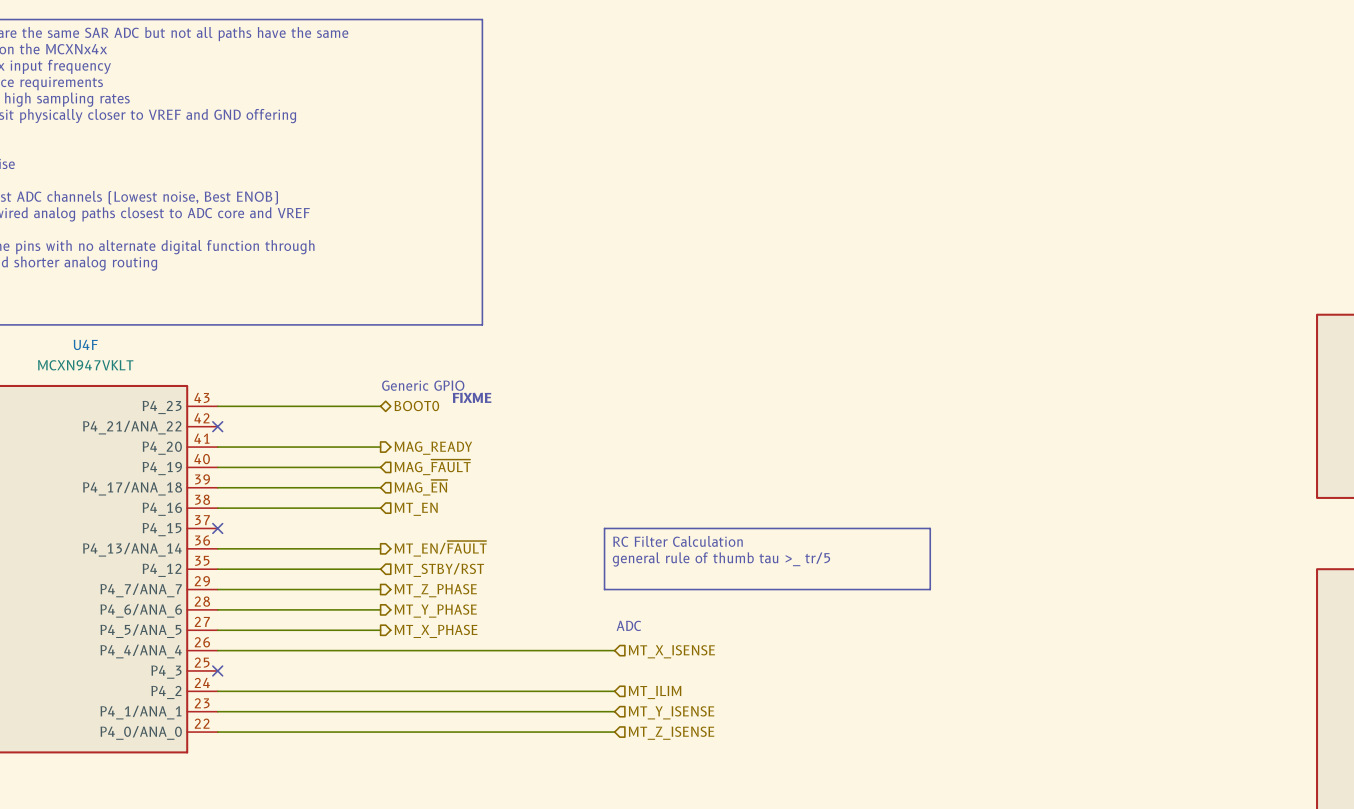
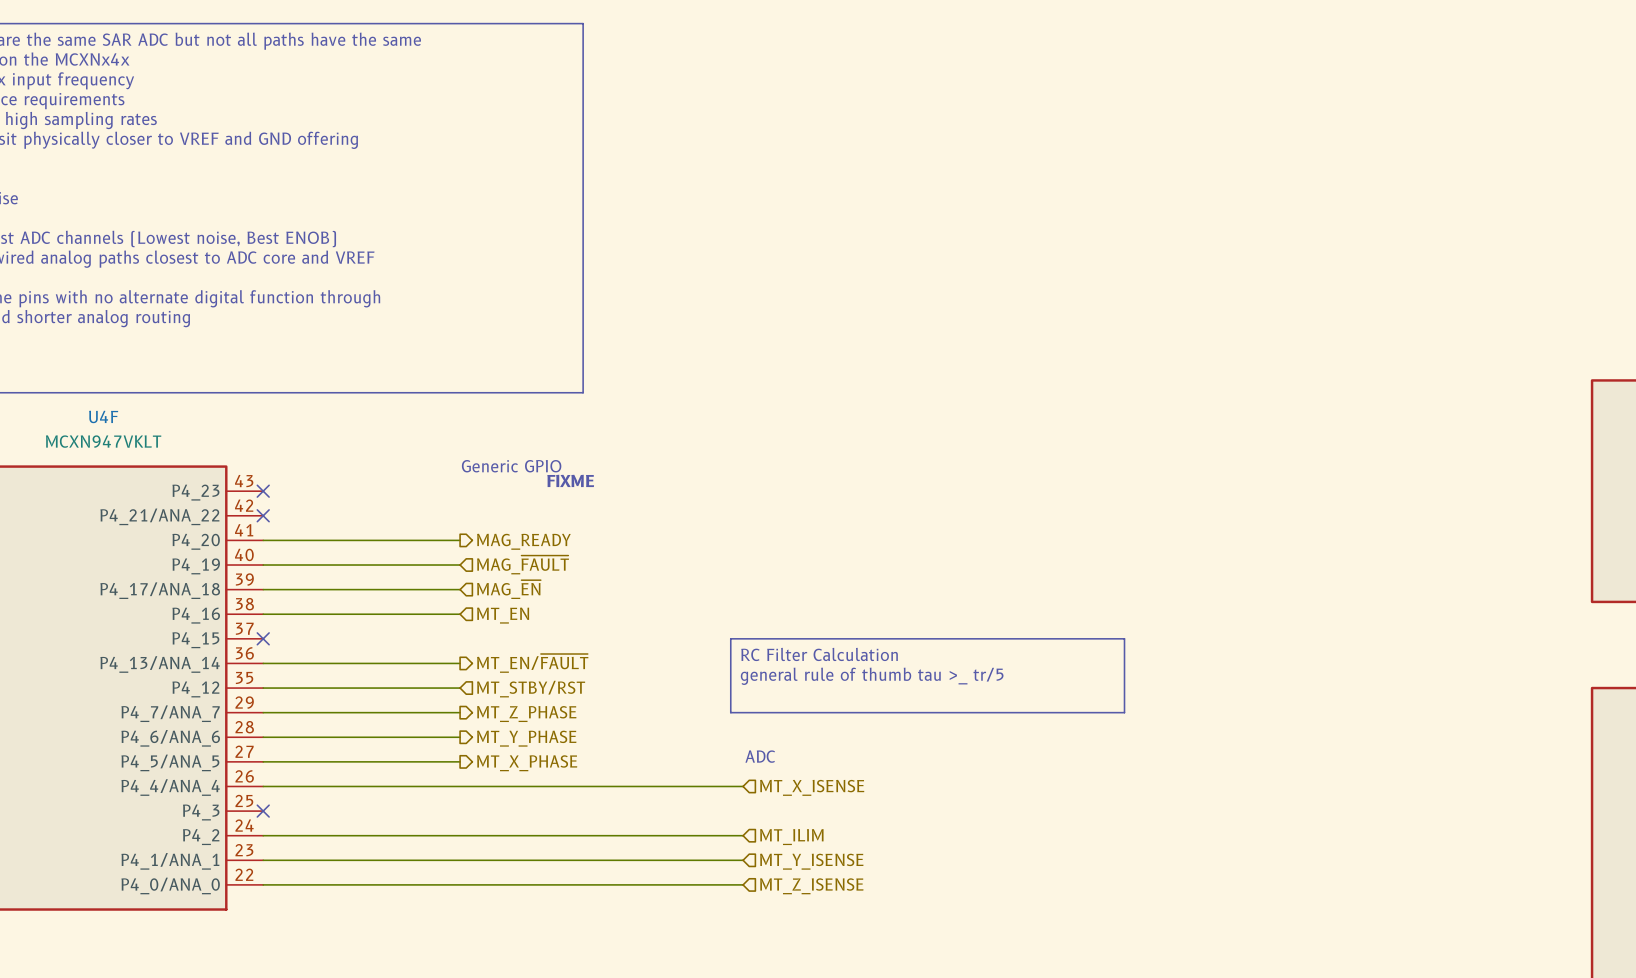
wire: (217, 406) (380, 406) -> none
no-connect mark: none -> (263, 491)
hierarchical label: BOOT0 (416, 406) -> none

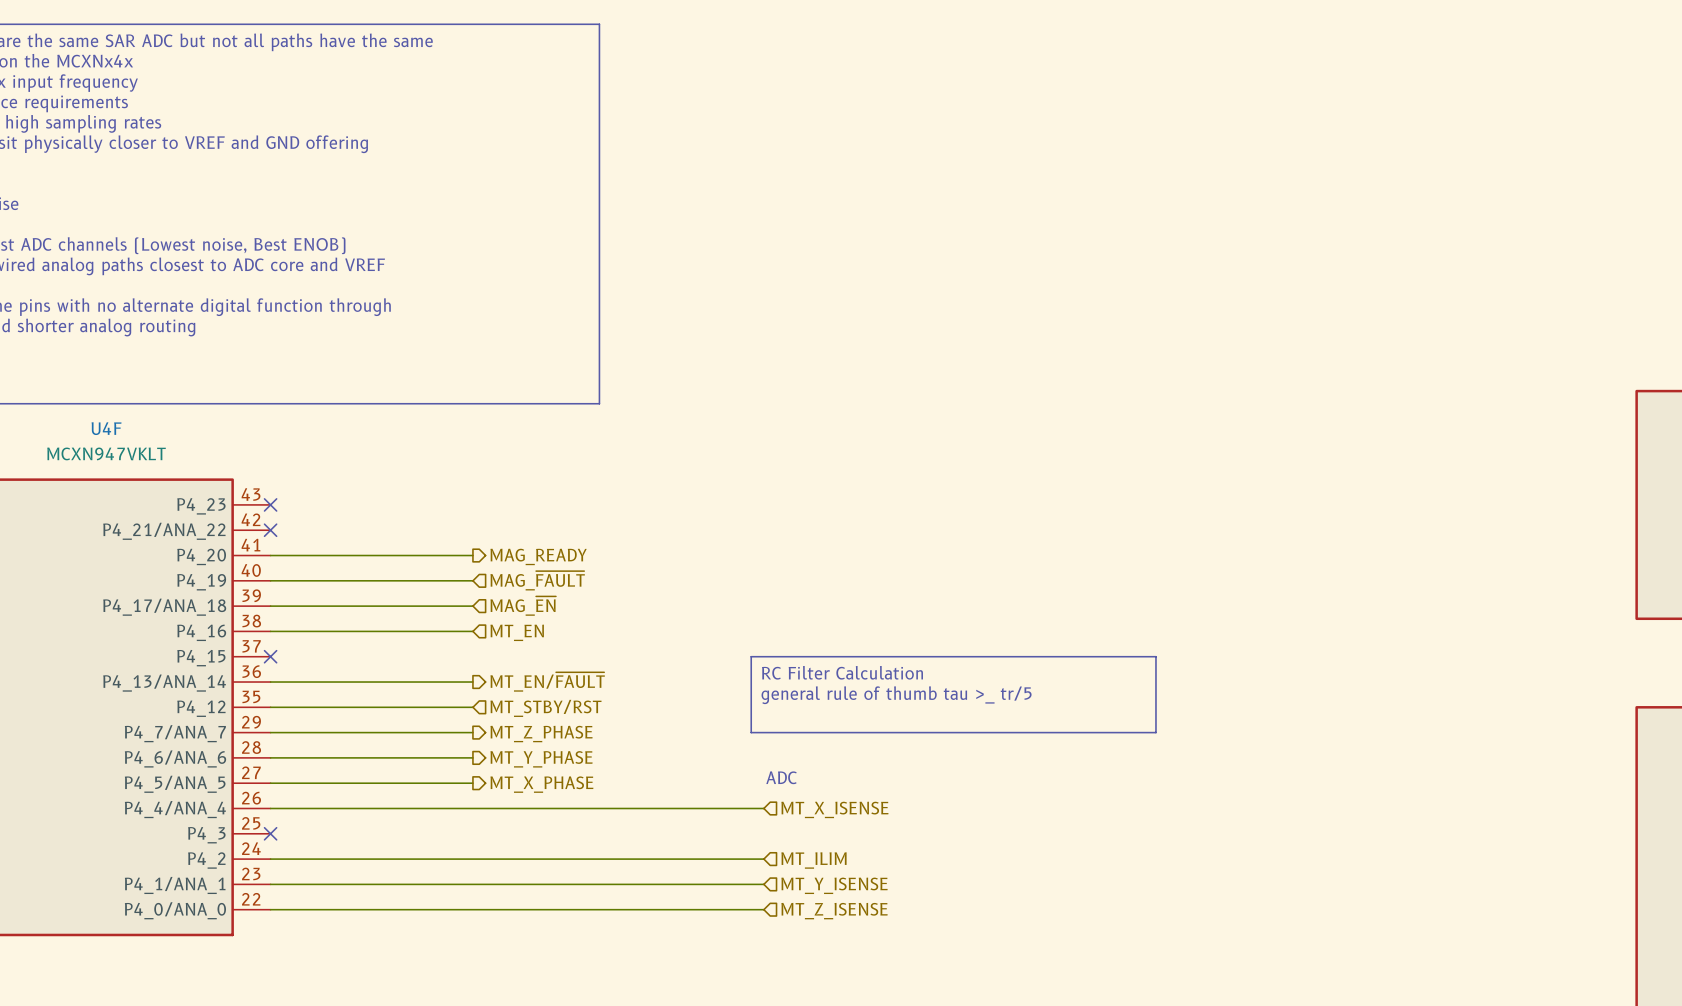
text: Generic GPIO (511, 466) -> none
text: FIXME (570, 480) -> none

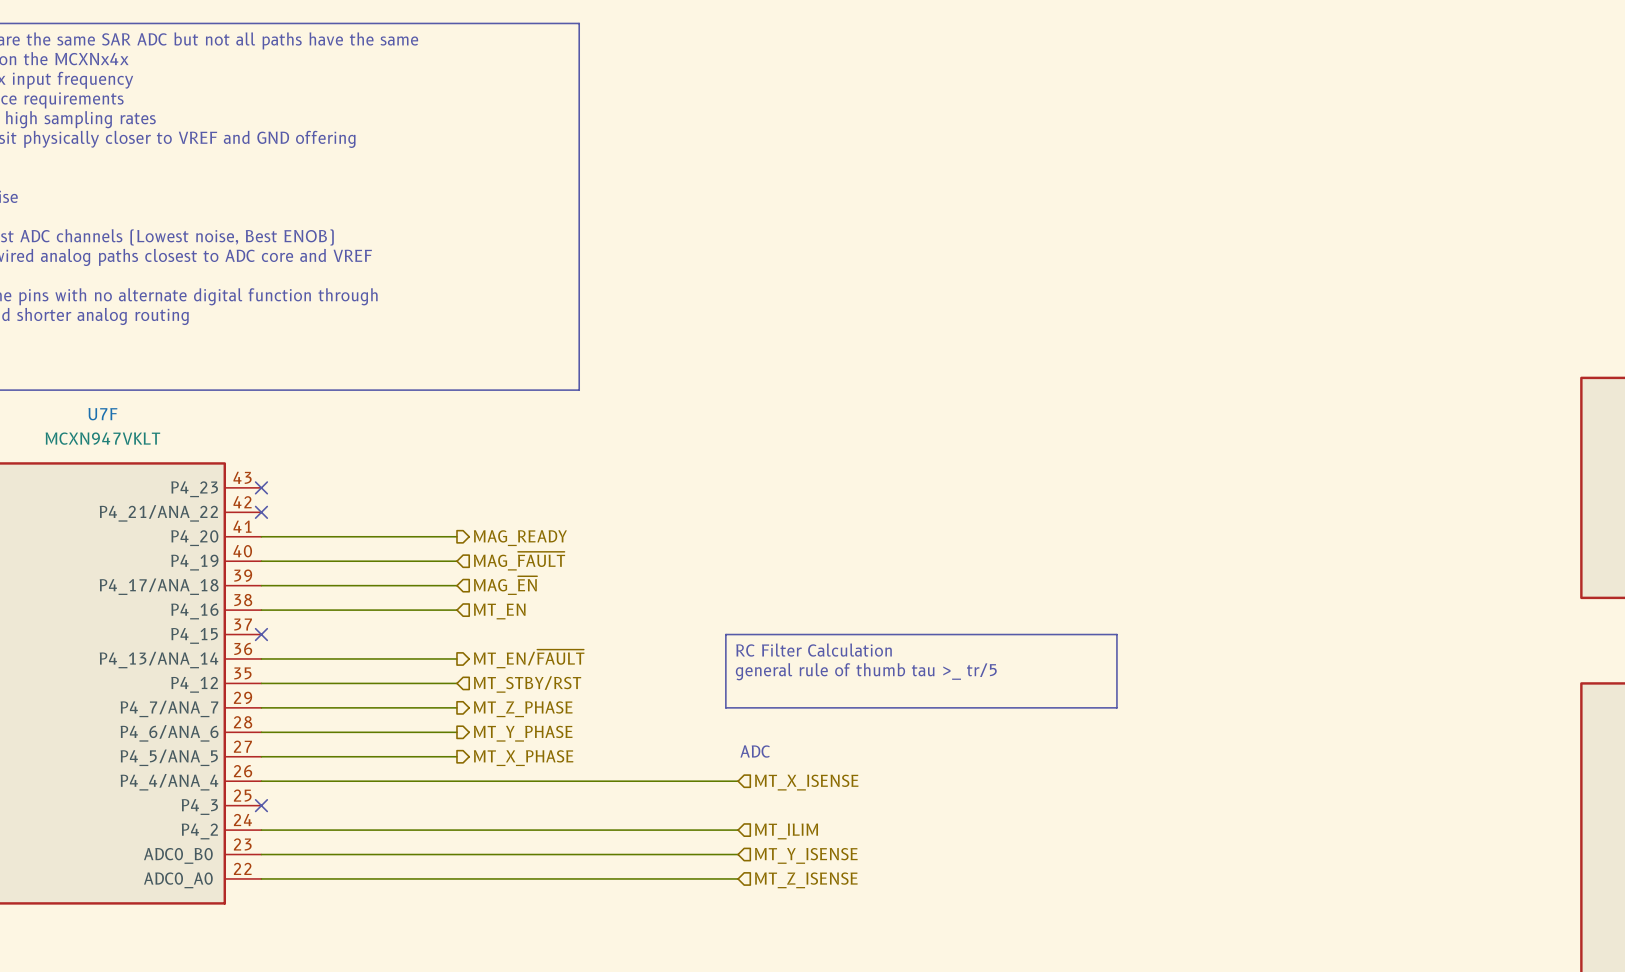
U4F name: U4F (106, 428) -> U7F (102, 414)
U4F pin name: P4_1/ANA_1 (175, 885) -> ADC0_B0 (178, 855)
U4F pin name: P4_0/ANA_0 (175, 910) -> ADC0_A0 (178, 880)

